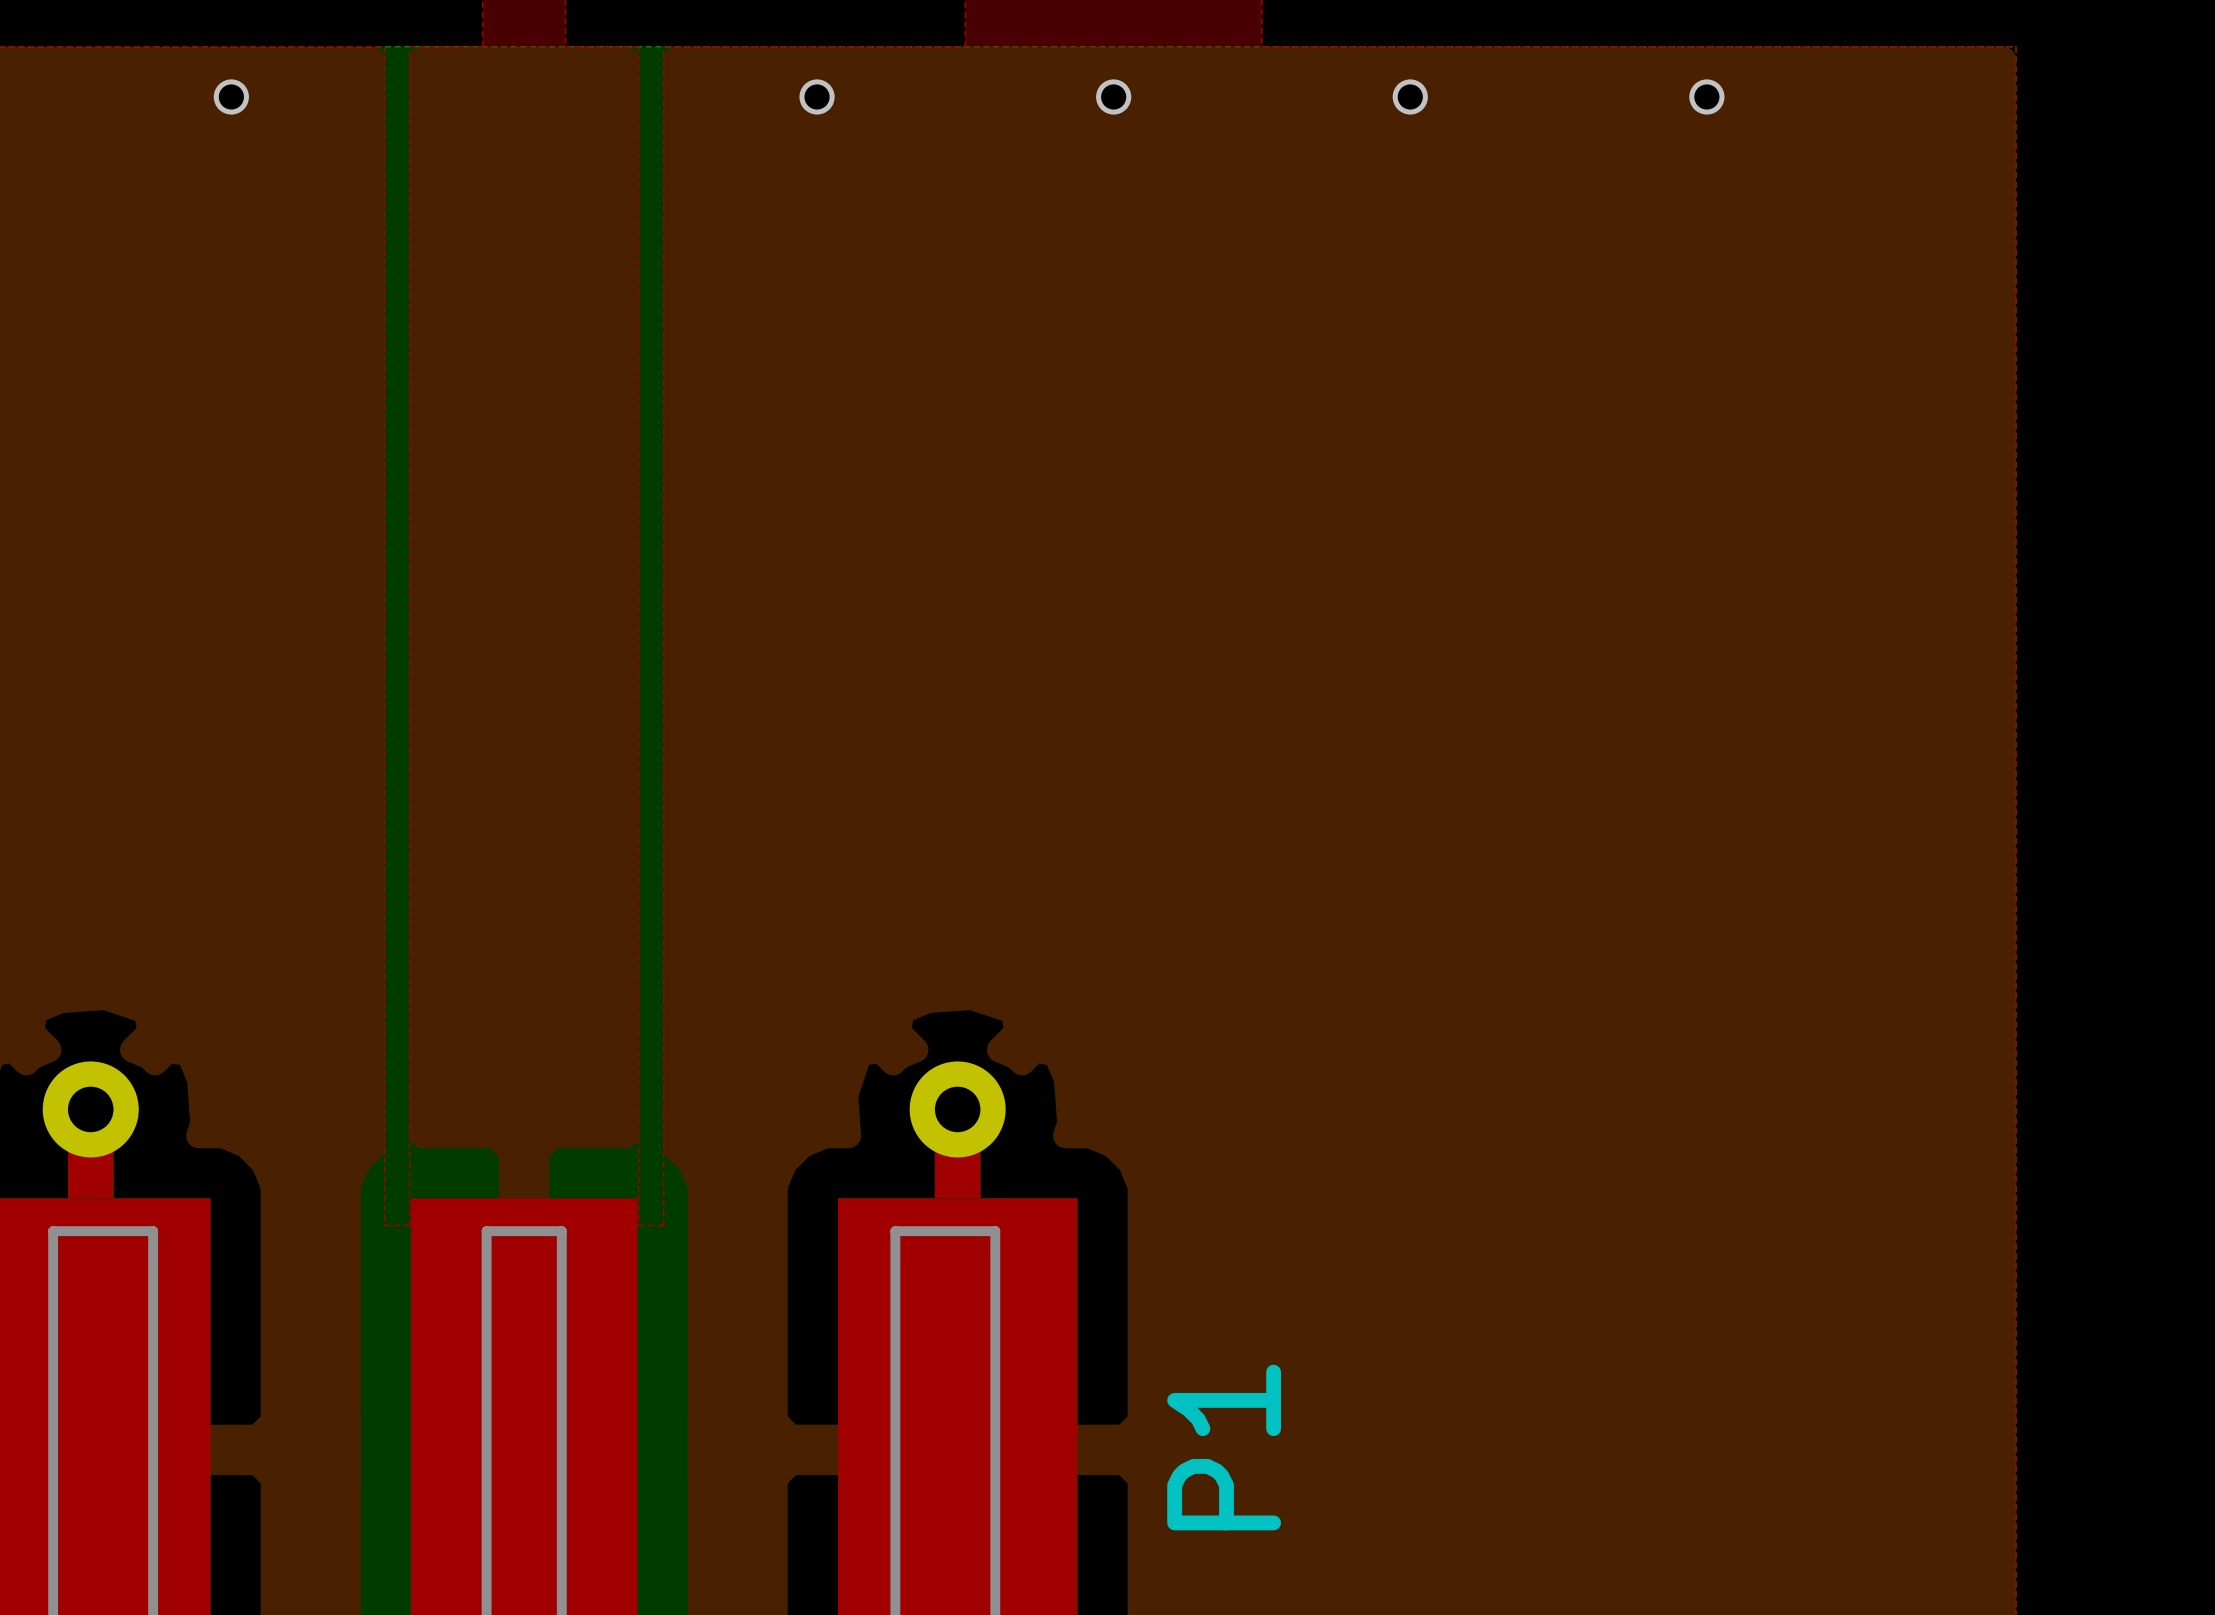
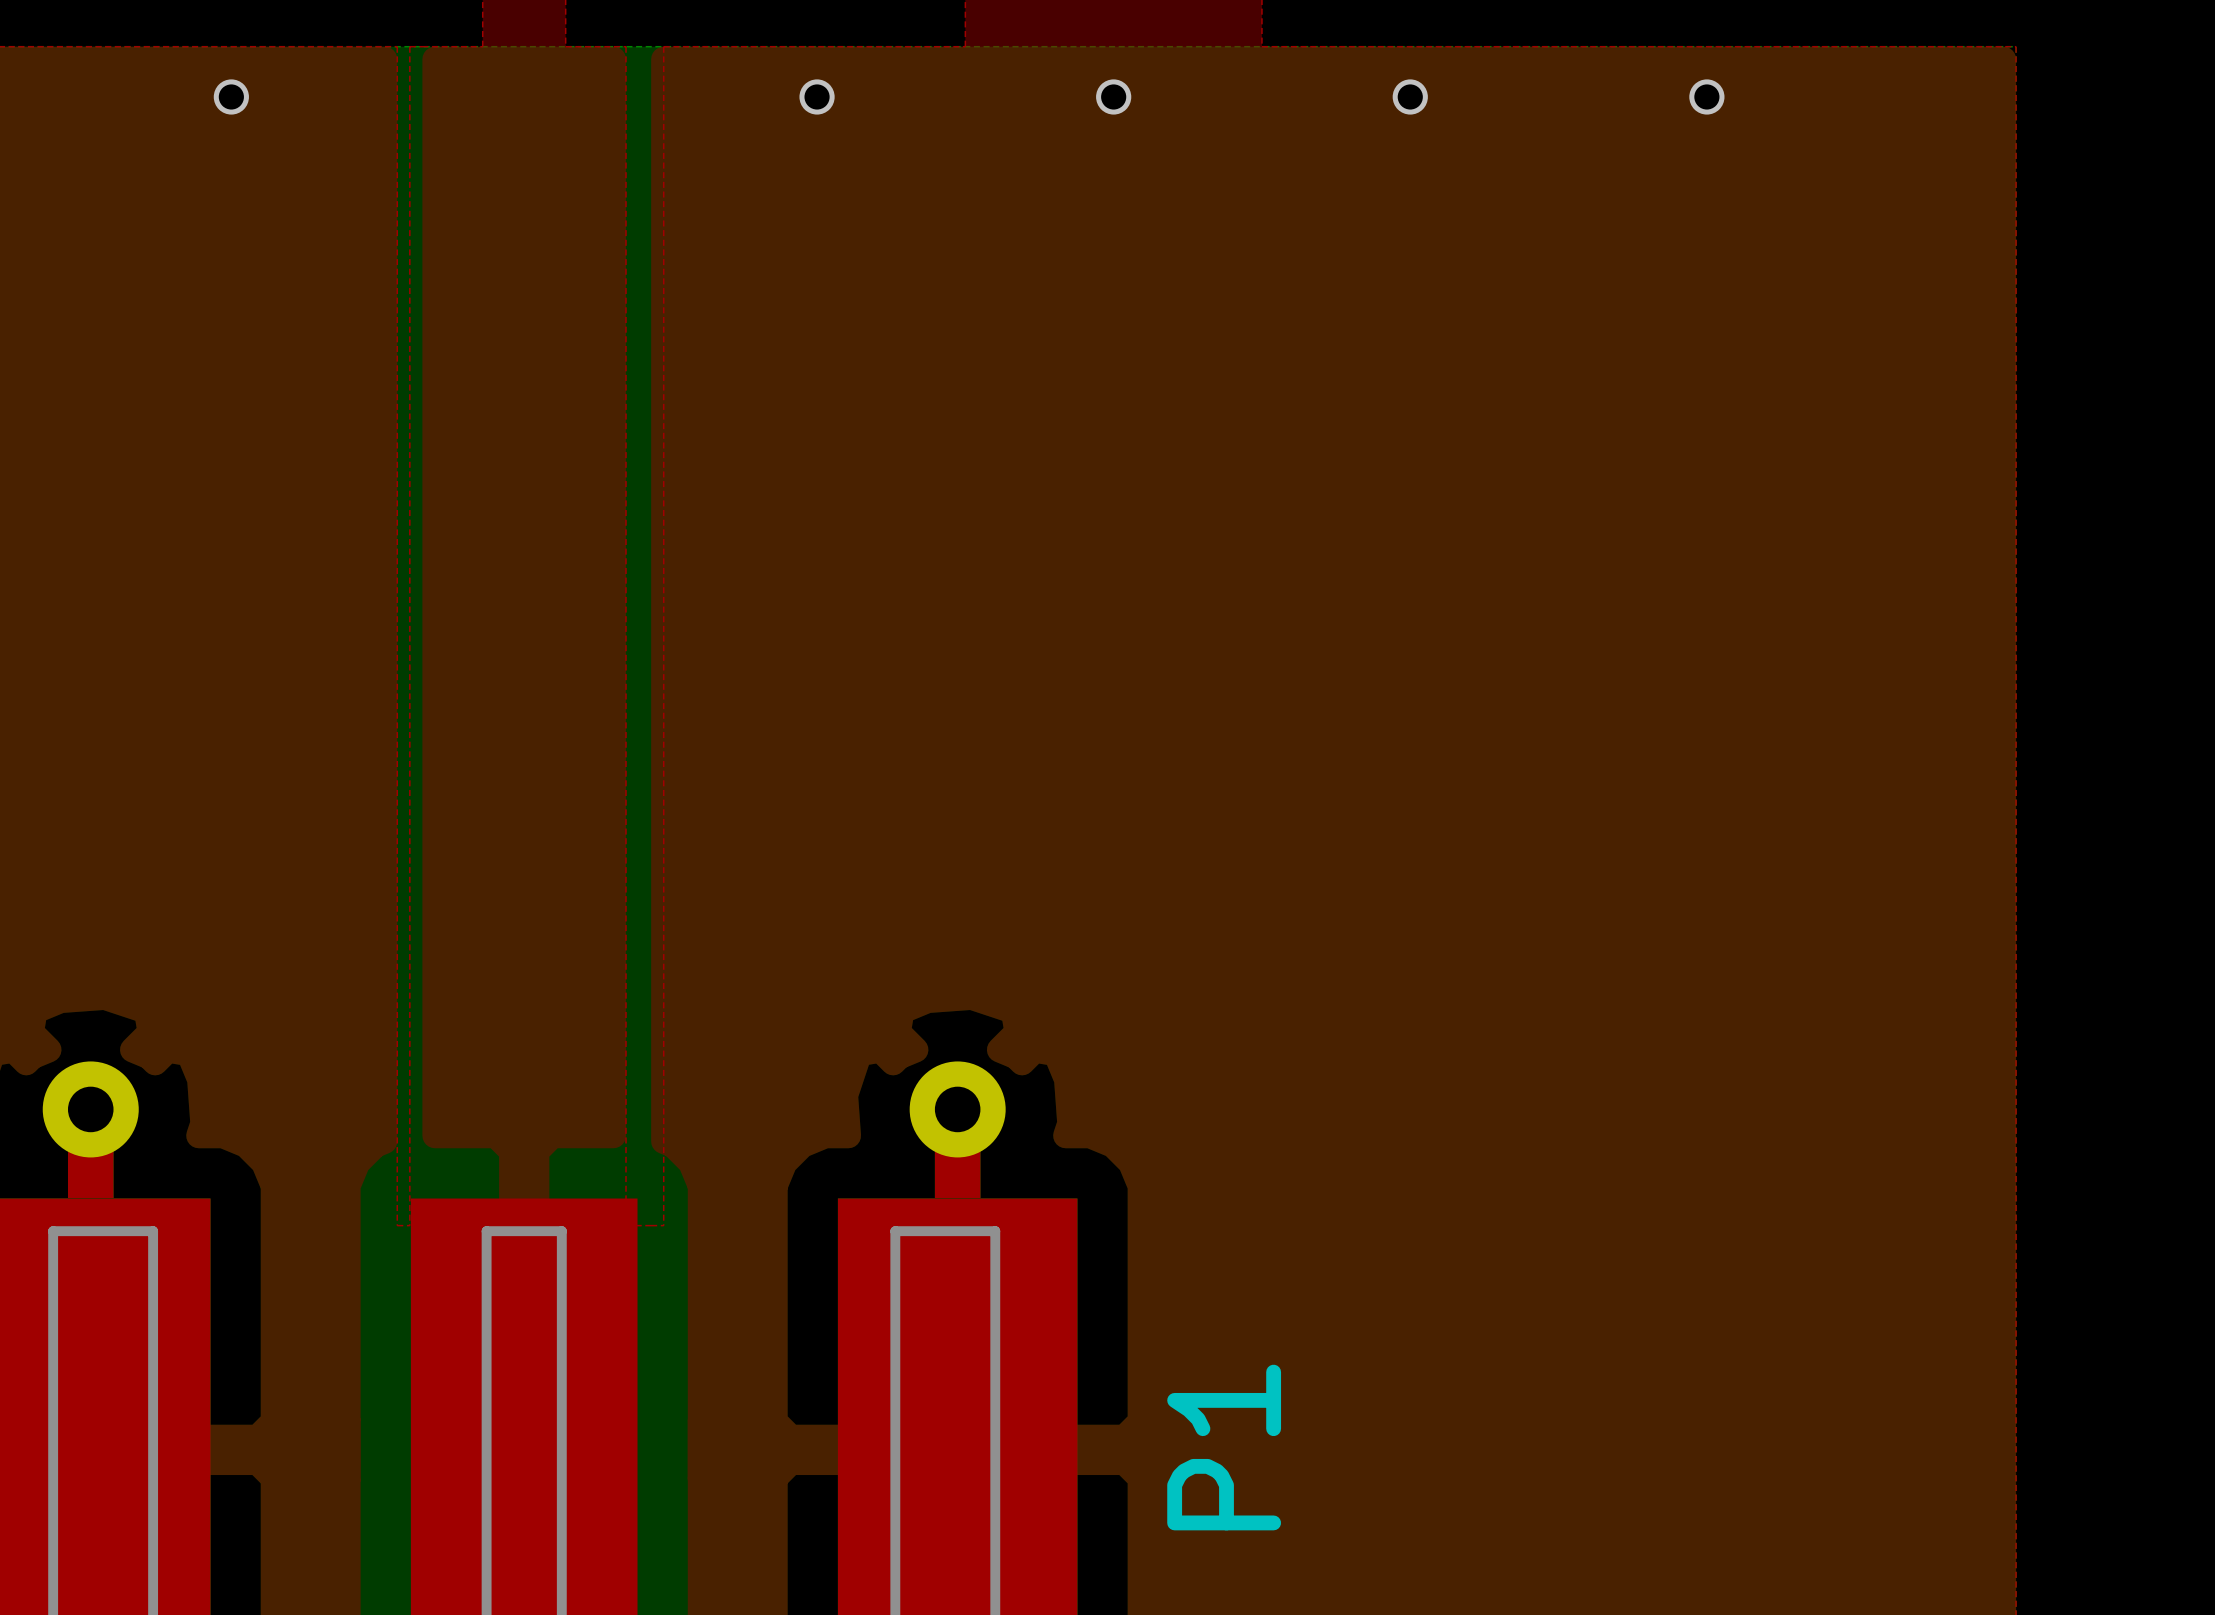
top zone outline: (384, 46) (384, 1225) (397, 1225) -> (384, 46) (397, 46) (397, 1225)
top zone outline: (626, 46) (638, 46) (638, 1225) -> (626, 46) (626, 1225) (638, 1225)

